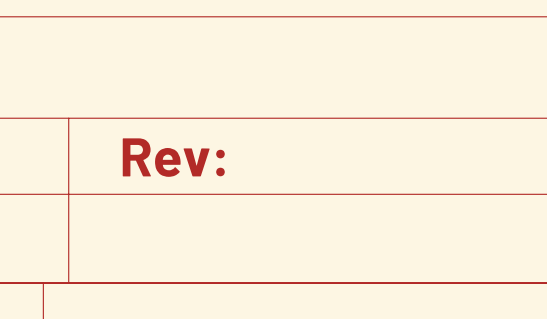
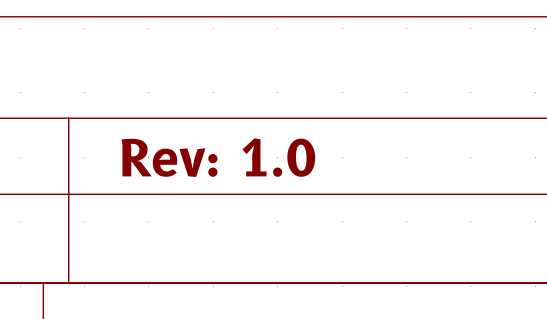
title block: Rev: (173, 157) -> Rev: 1.0 (218, 157)

